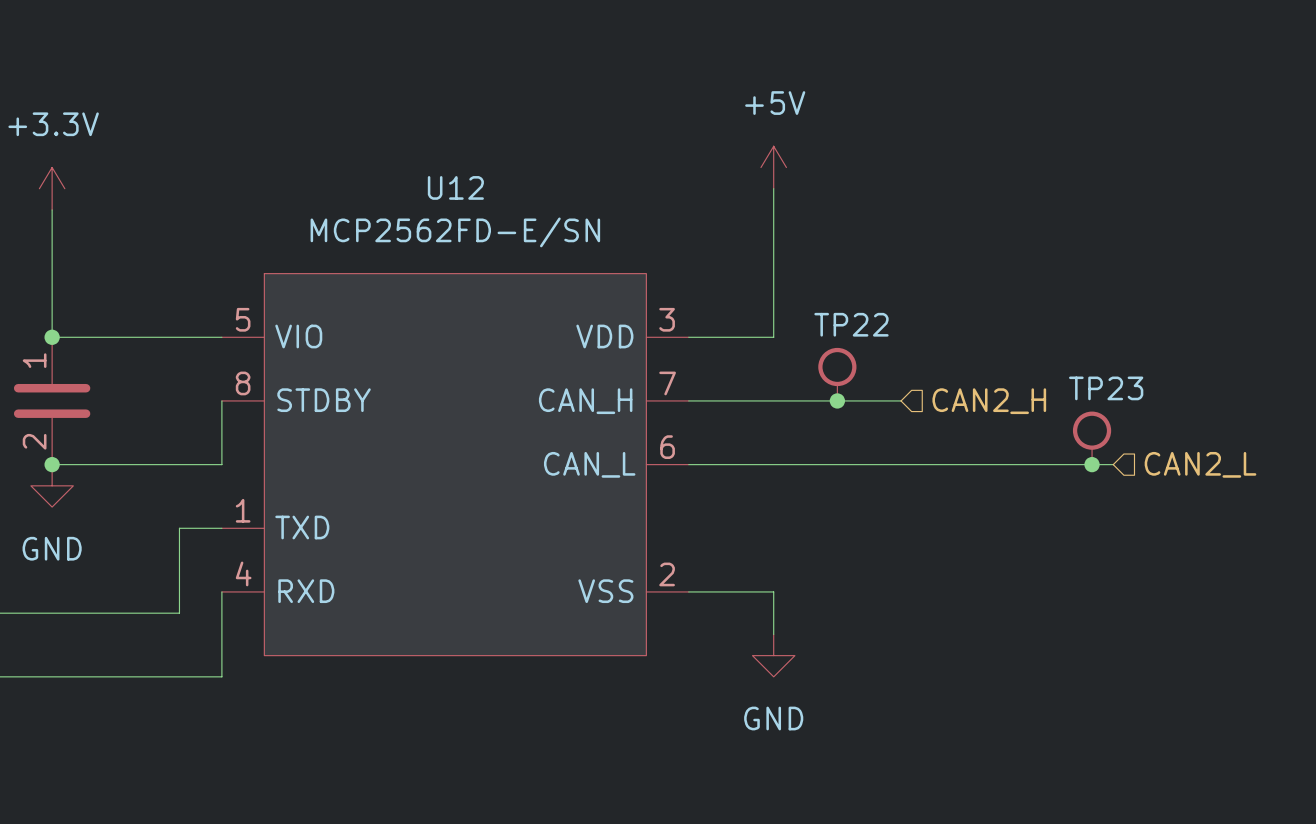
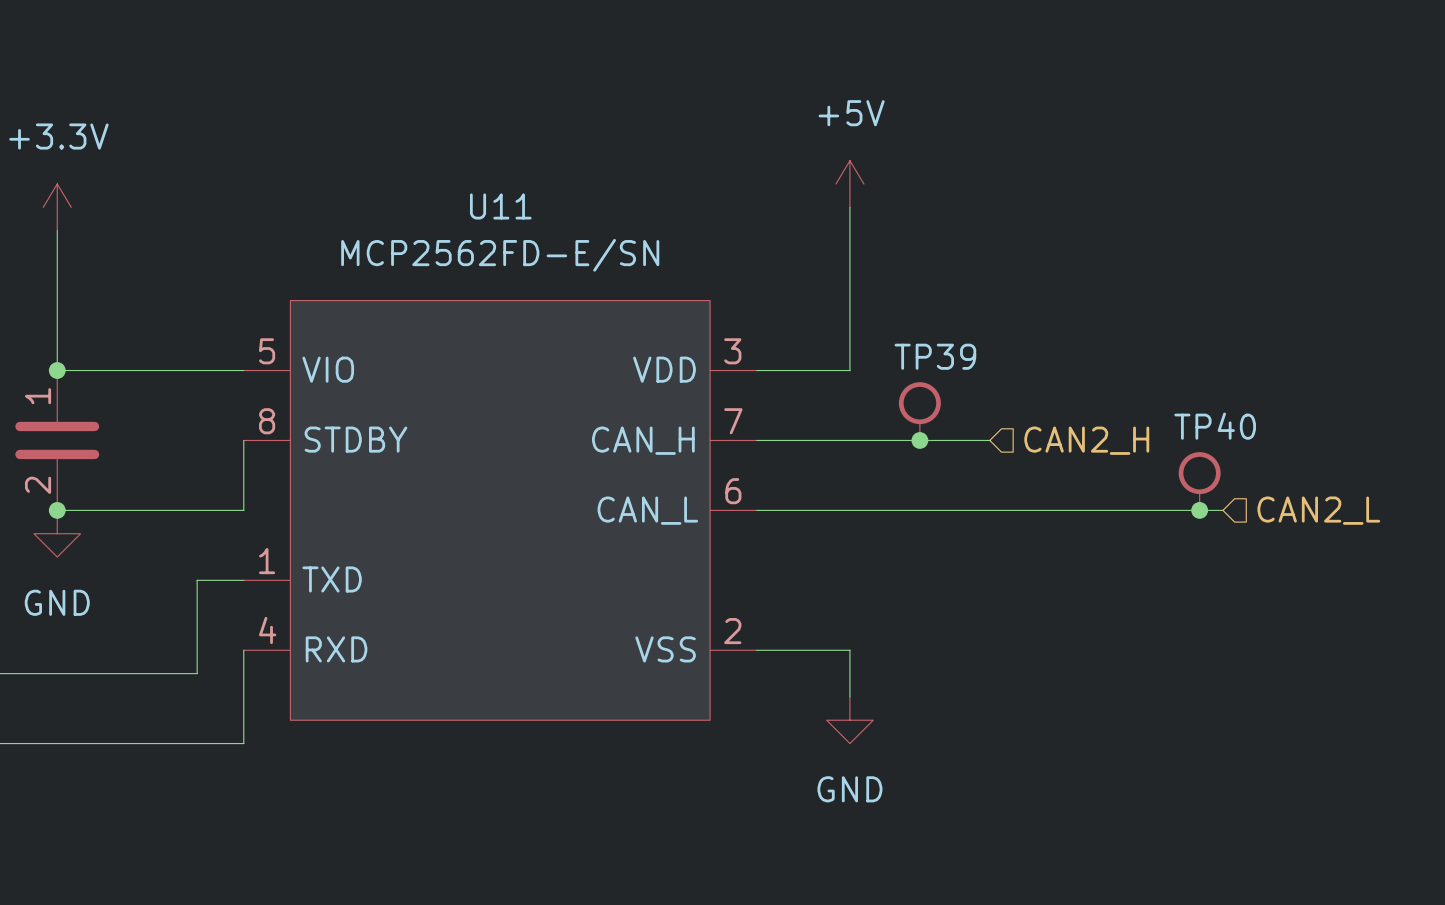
U12 name: U12 (455, 187) -> U11 (500, 206)
TP22 name: TP22 (851, 324) -> TP39 (935, 356)
TP23 name: TP23 (1106, 388) -> TP40 (1215, 426)

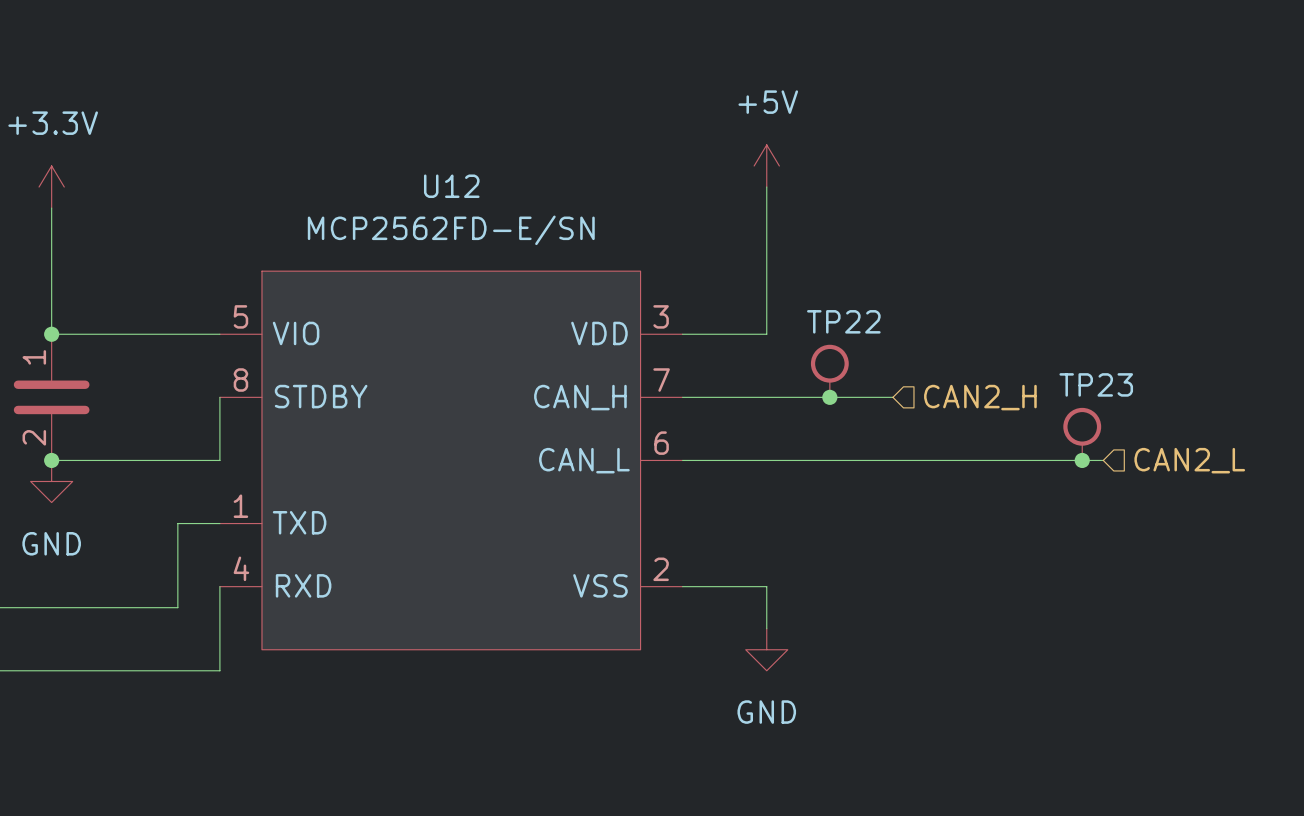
U11 name: U11 (500, 206) -> U12 (451, 186)
TP39 name: TP39 (935, 356) -> TP22 (843, 321)
TP40 name: TP40 (1215, 426) -> TP23 (1096, 384)

